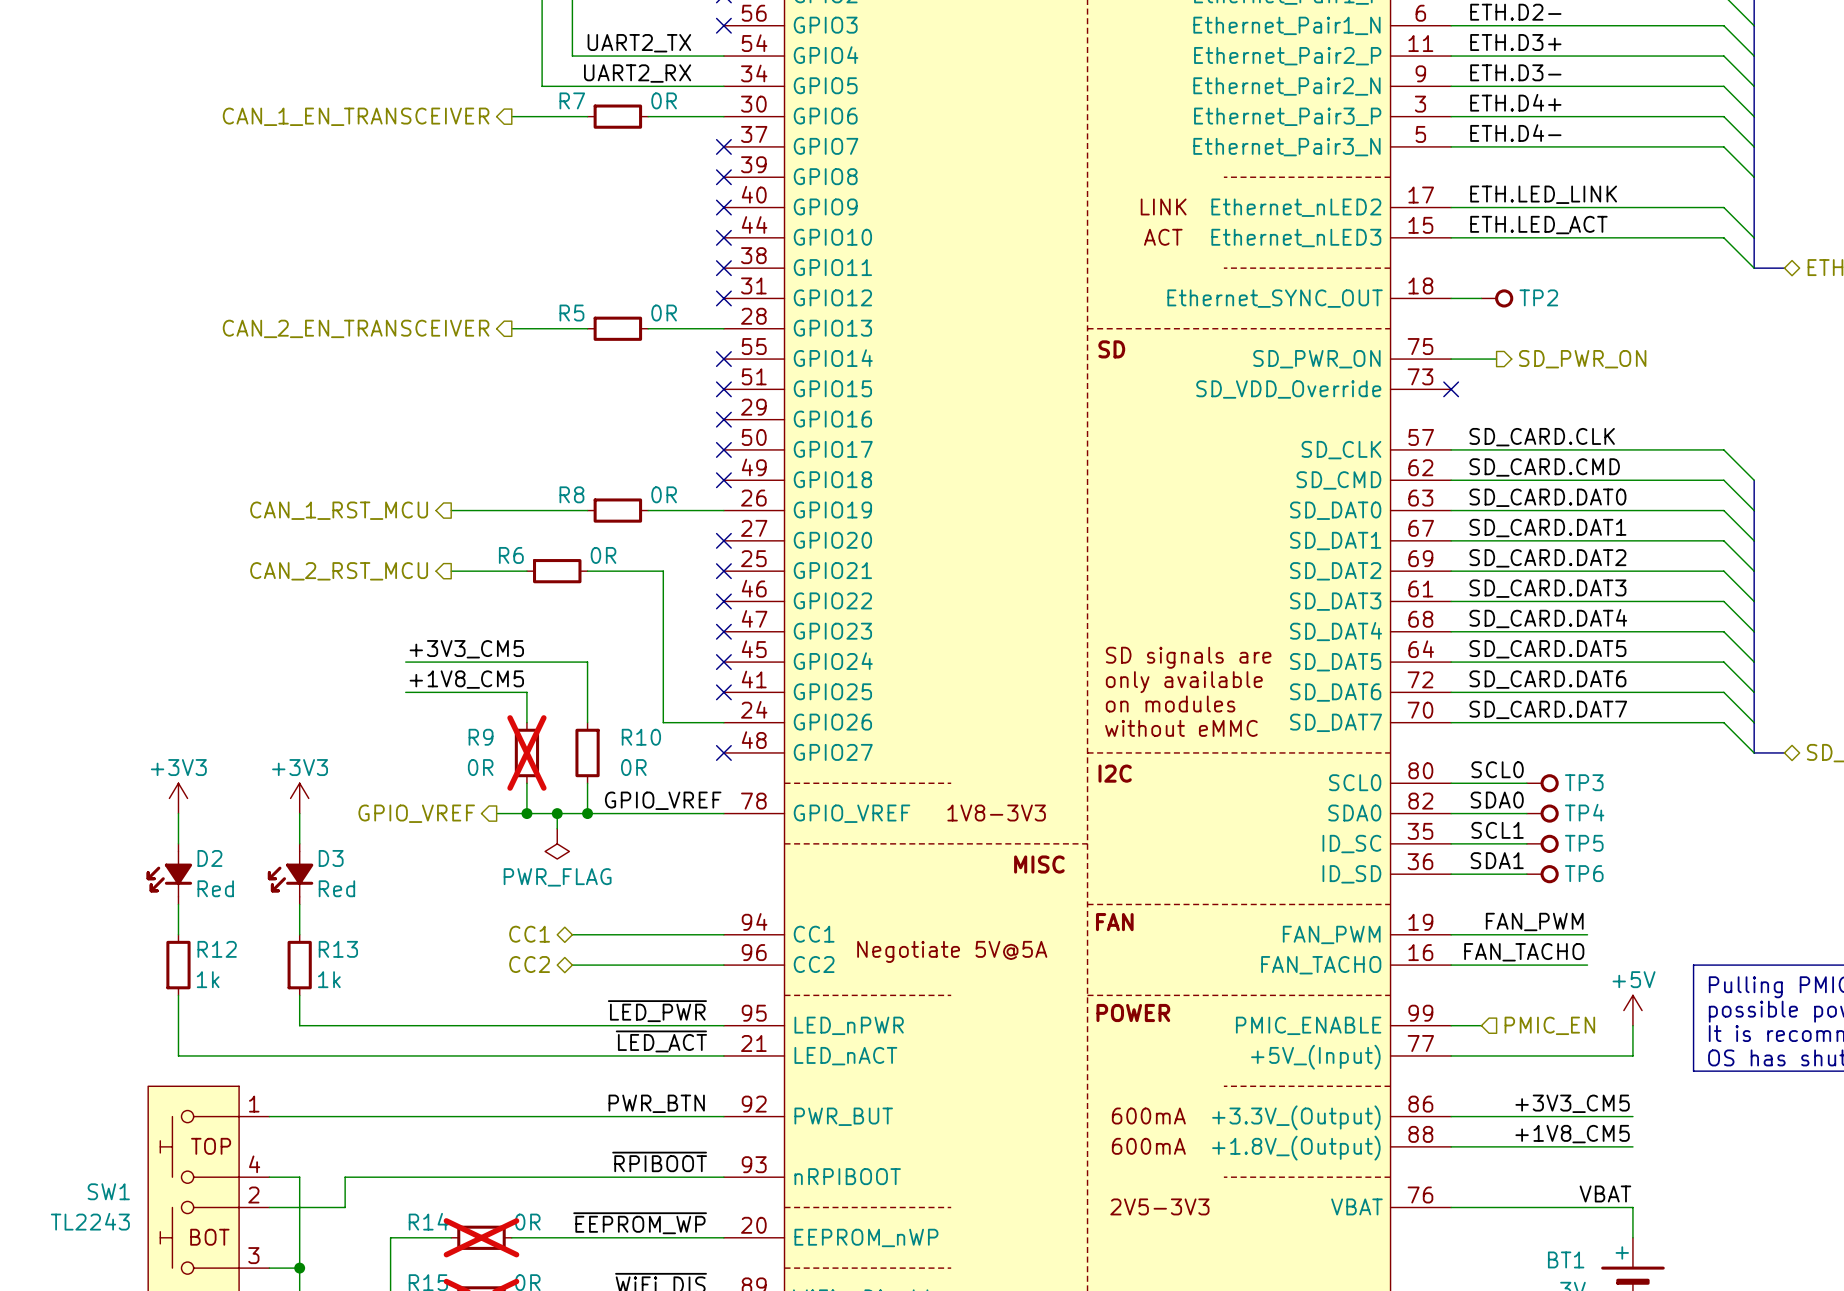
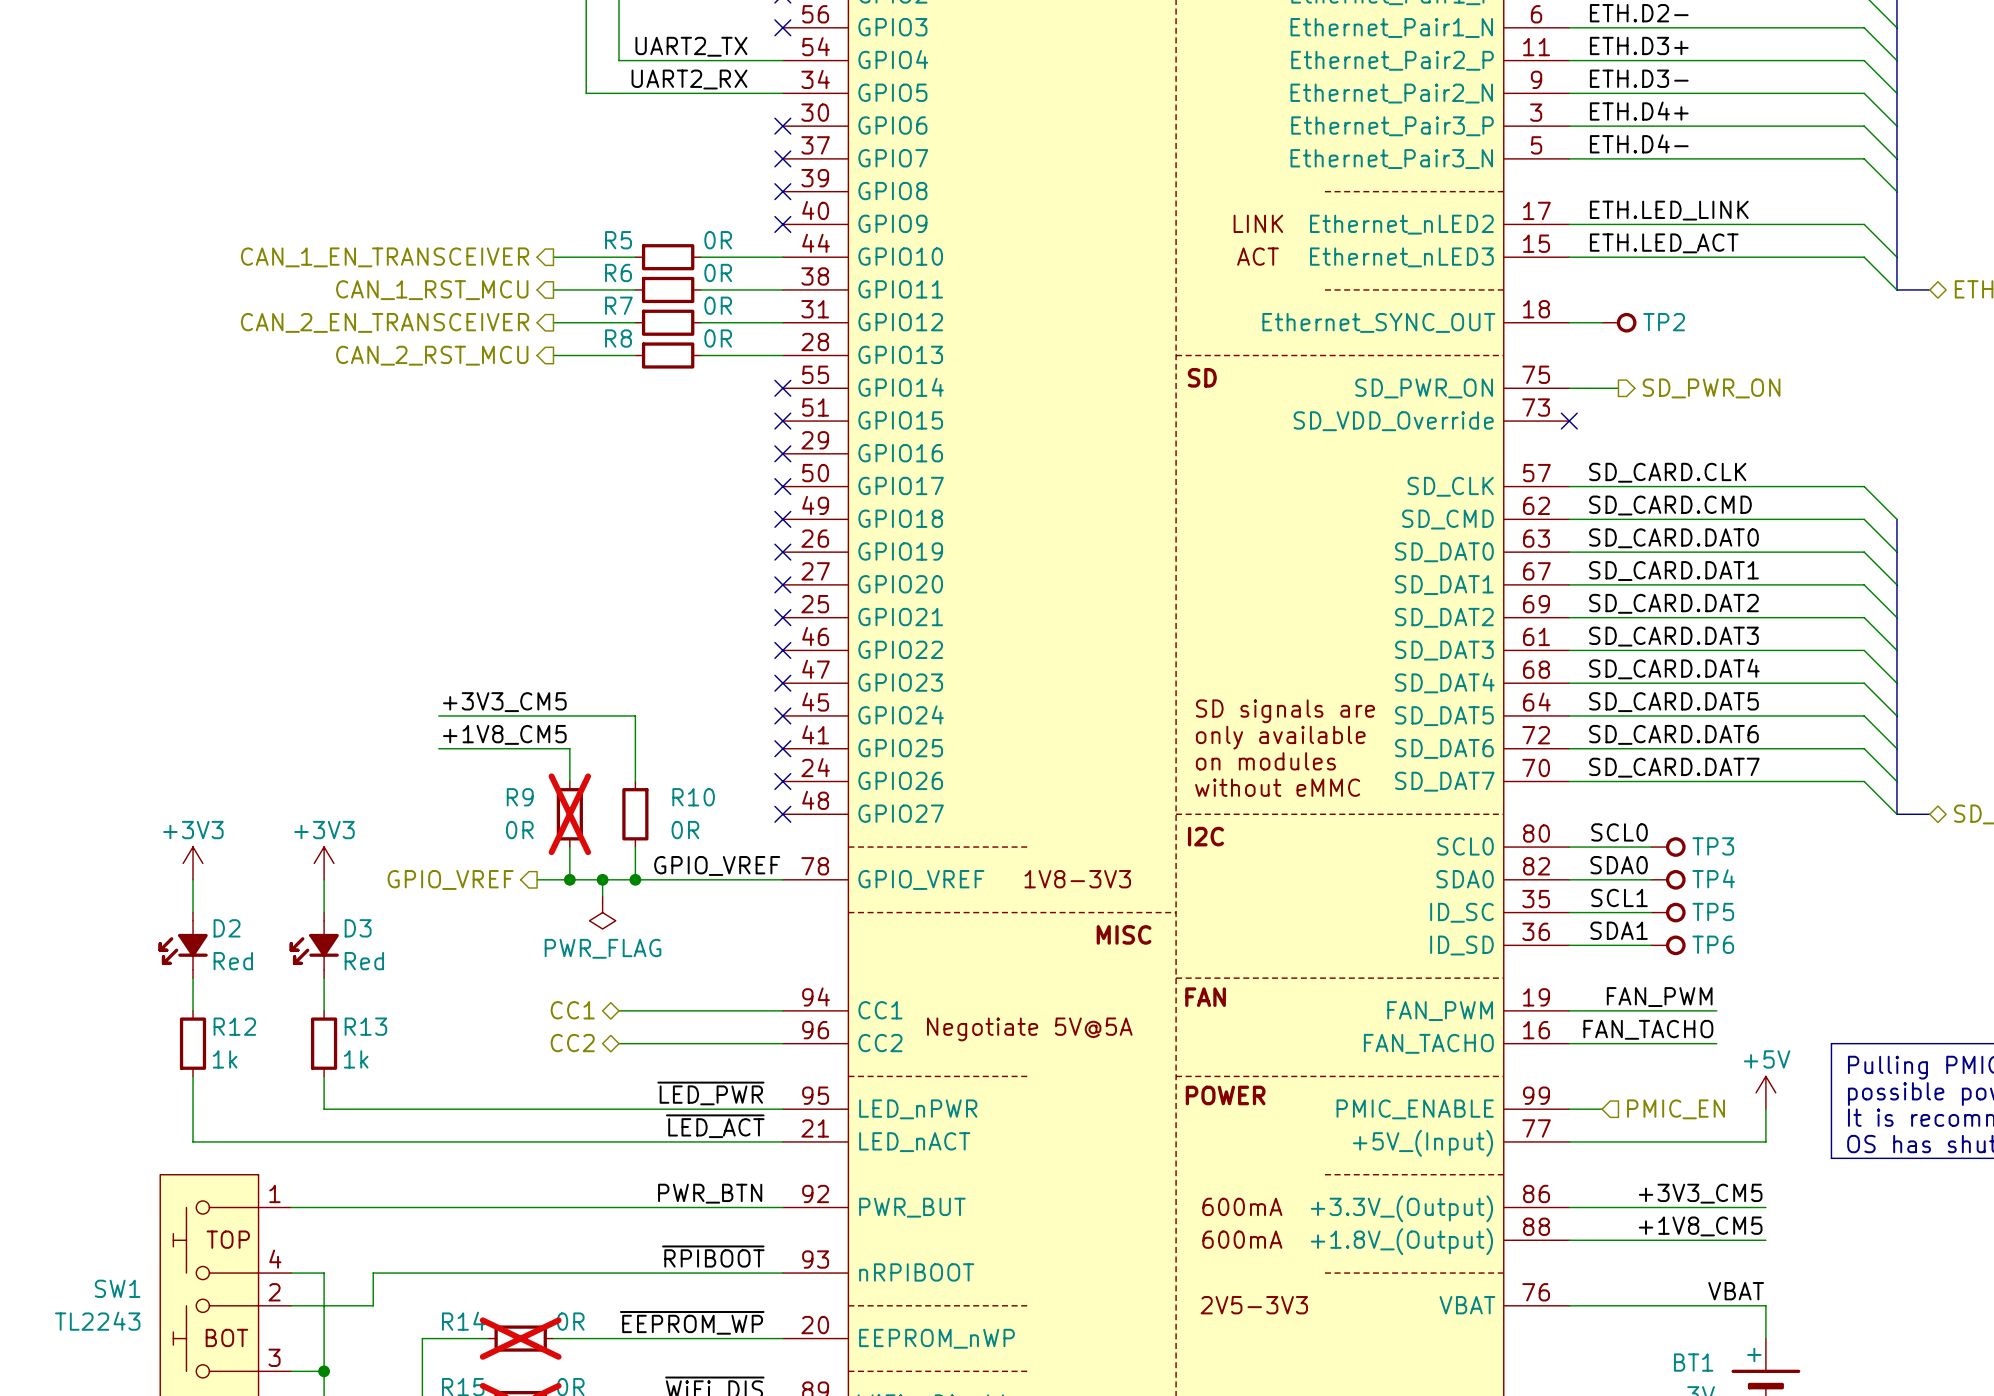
hierarchical label position: CAN_1_EN_TRANSCEIVER (356, 116) -> CAN_1_EN_TRANSCEIVER (385, 257)
wire: (511, 116) (587, 116) -> (553, 257) (635, 257)
R7 position: (617, 116) -> (668, 322)
wire: (648, 116) (723, 116) -> (700, 257) (782, 257)
no-connect mark: none -> (782, 126)
R5: none -> (668, 257)
no-connect mark: (723, 237) -> none
wire: none -> (553, 289) (635, 289)
wire: none -> (700, 289) (782, 289)
no-connect mark: (723, 268) -> none
hierarchical label: none -> CAN_2_EN_TRANSCEIVER (385, 322)
no-connect mark: (723, 298) -> none
R5 name: R5 (571, 313) -> R8 (618, 338)
hierarchical label: CAN_2_EN_TRANSCEIVER (356, 328) -> CAN_2_RST_MCU (432, 355)
hierarchical label position: CAN_1_RST_MCU (339, 510) -> CAN_1_RST_MCU (432, 290)
wire: (451, 510) (587, 510) -> none
R8: (617, 510) -> none
wire: (648, 510) (723, 510) -> (700, 322) (782, 322)
no-connect mark: none -> (782, 552)
hierarchical label: CAN_2_RST_MCU (339, 571) -> none
wire: (451, 571) (526, 571) -> (553, 322) (635, 322)
R6 position: (557, 571) -> (668, 289)
wire: (587, 571) (663, 571) (663, 722) (723, 722) -> none
no-connect mark: none -> (782, 781)

